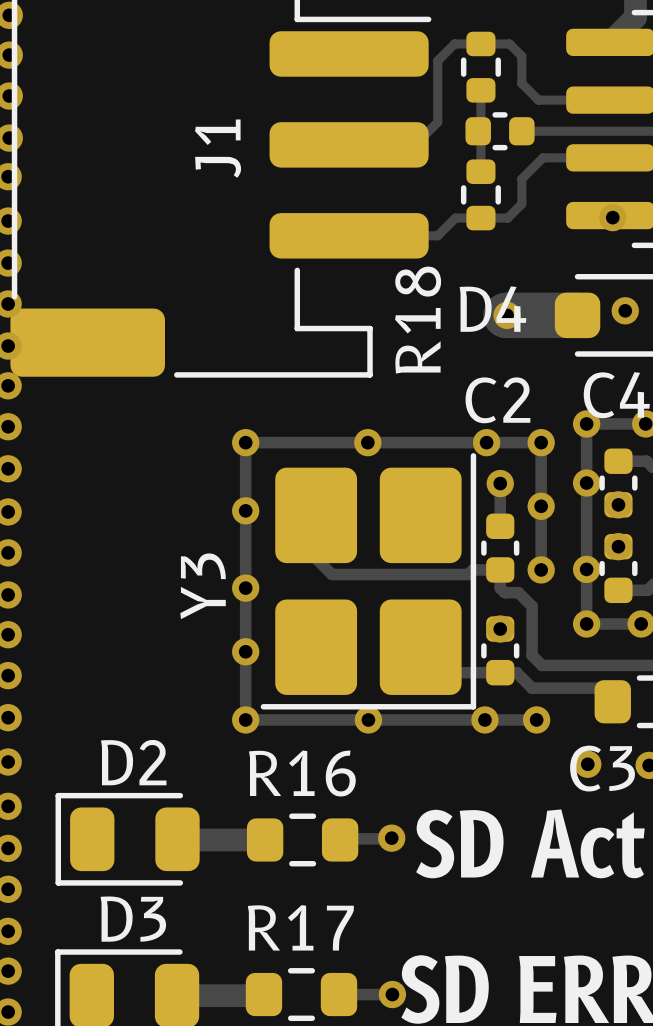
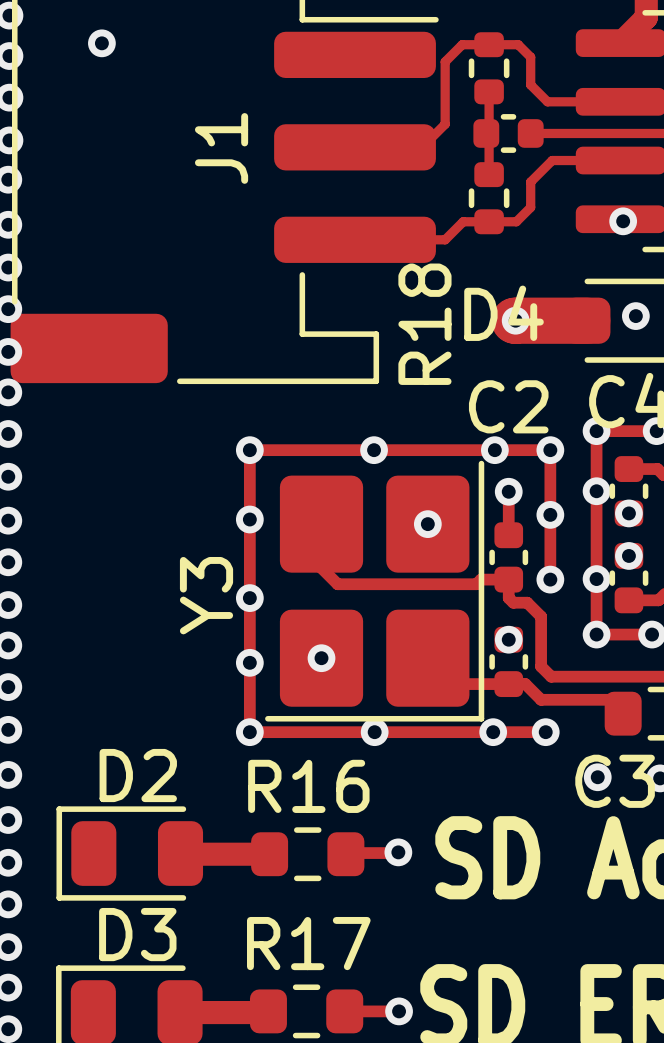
via: none -> (101, 43)
via: none -> (427, 524)
via: none -> (321, 658)

